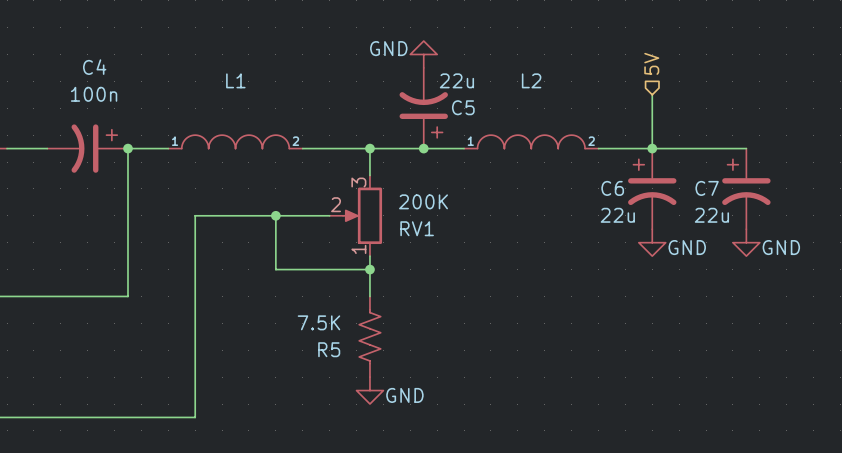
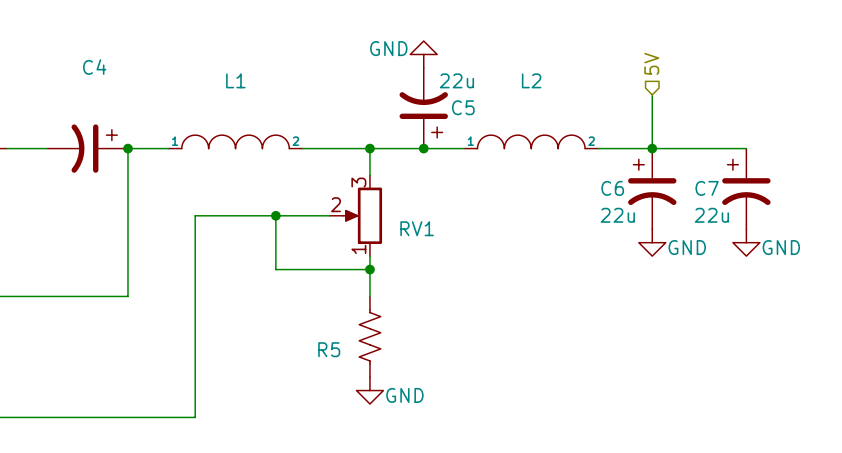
C4 value: 100n (94, 94) -> none
RV1 value: 200K (423, 201) -> none
R5 value: 7.5K (318, 322) -> none

